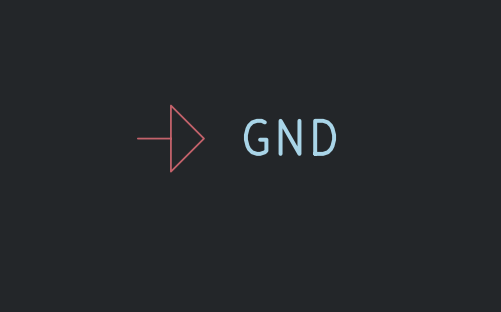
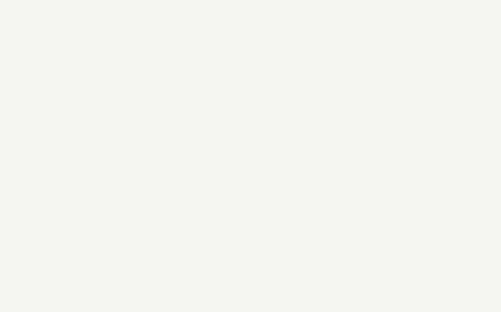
power symbol: GND (170, 138) -> none

